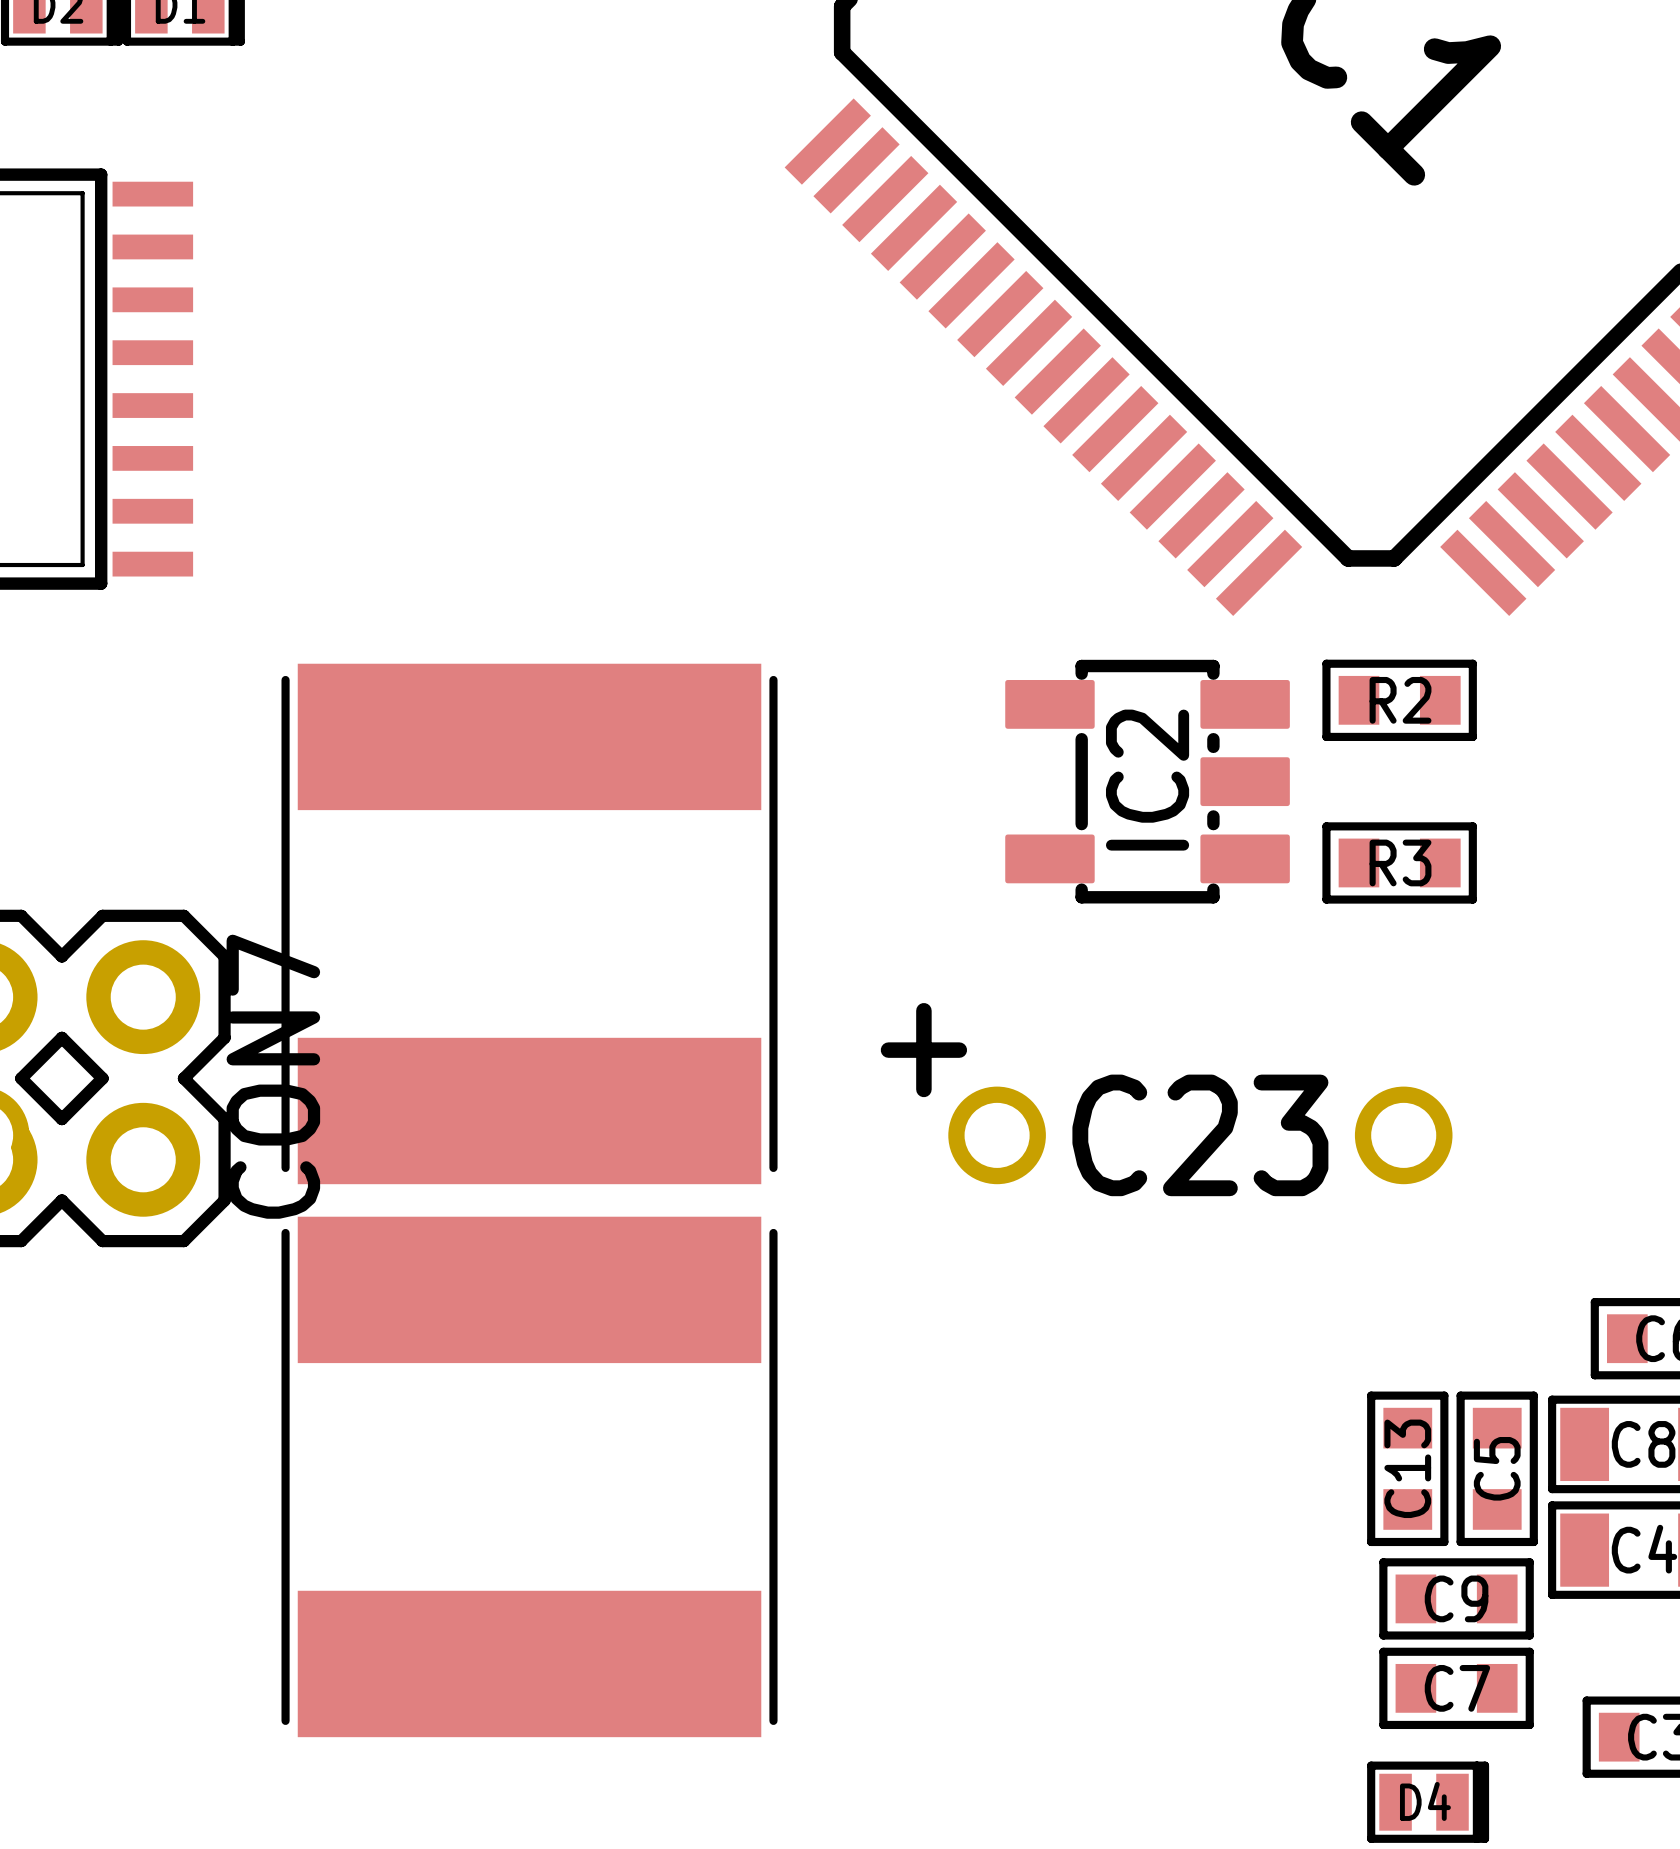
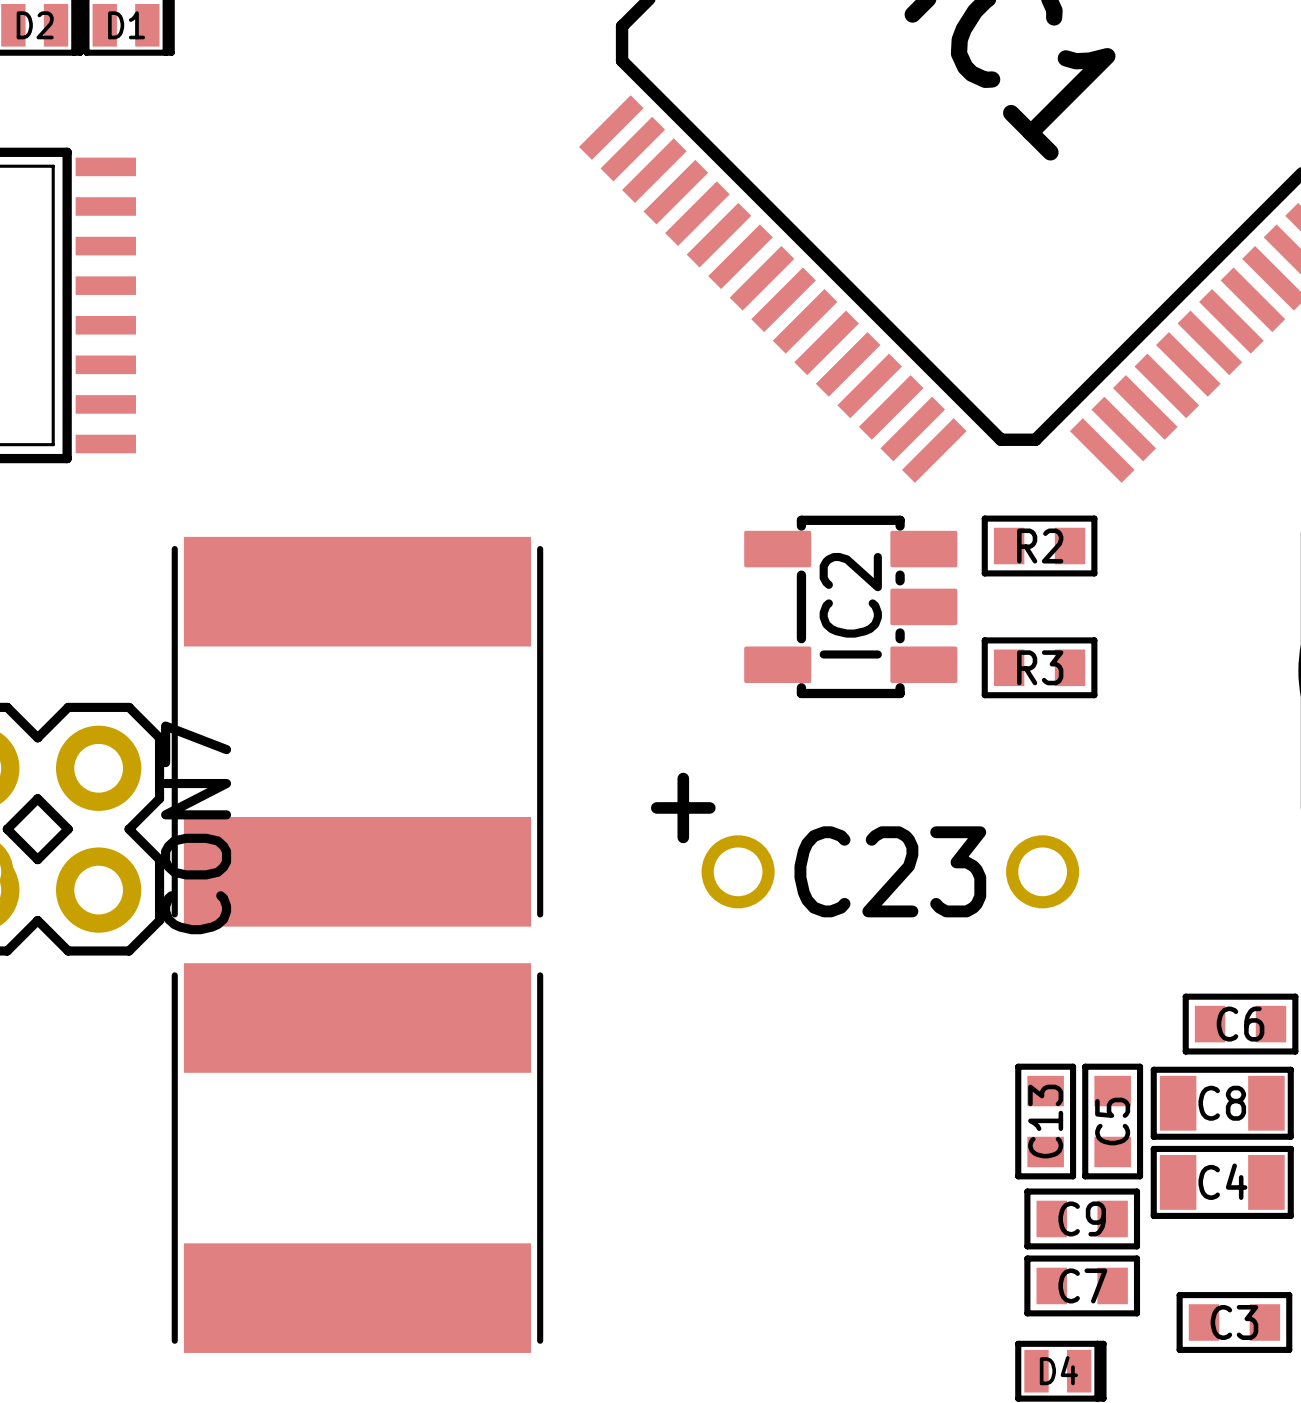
part position: (529, 923) -> (357, 731)
part position: (529, 1476) -> (357, 1158)

